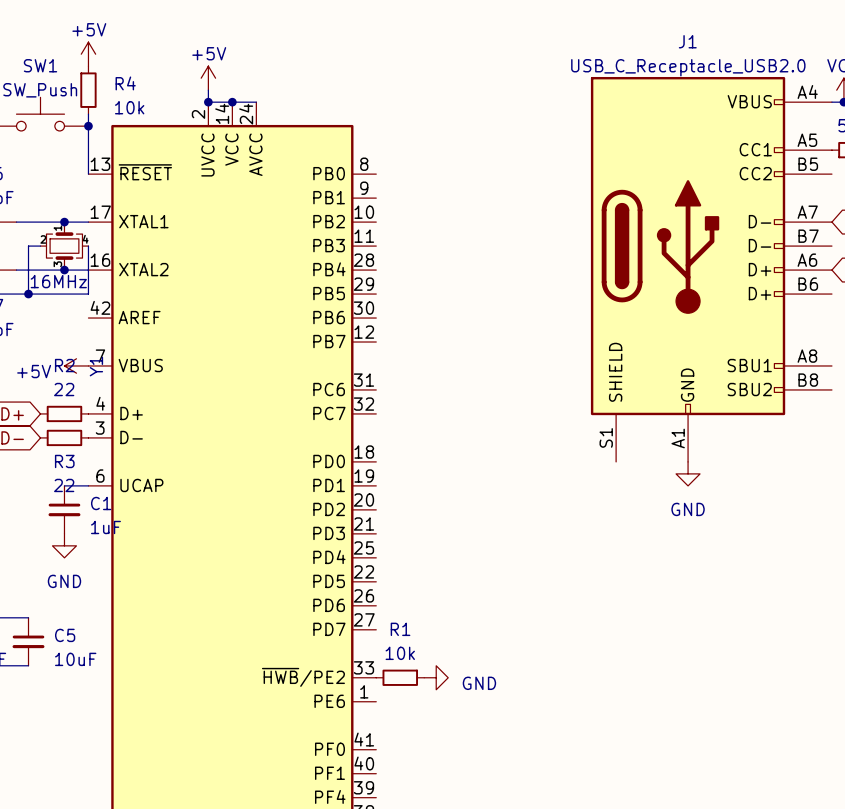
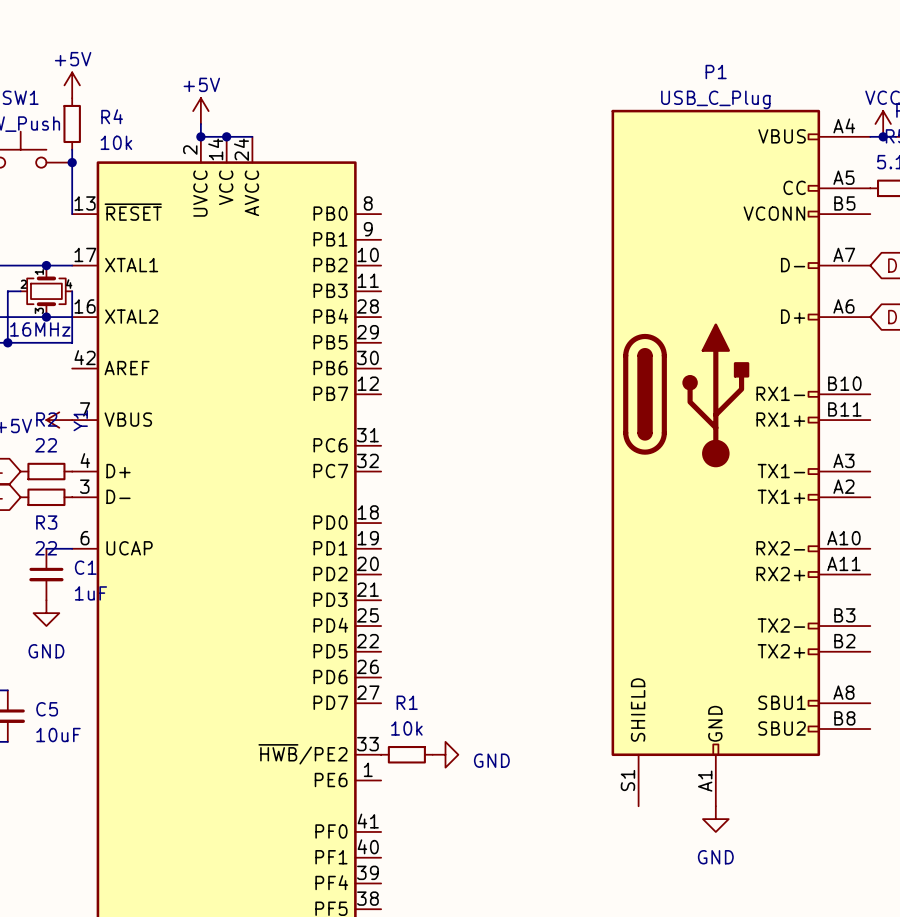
J1: USB_C_Receptacle_USB2.0 (711, 269) -> none
P1: none -> USB_C_Plug (740, 458)
power symbol: GND (688, 473) -> none
power symbol: none -> GND (715, 819)

